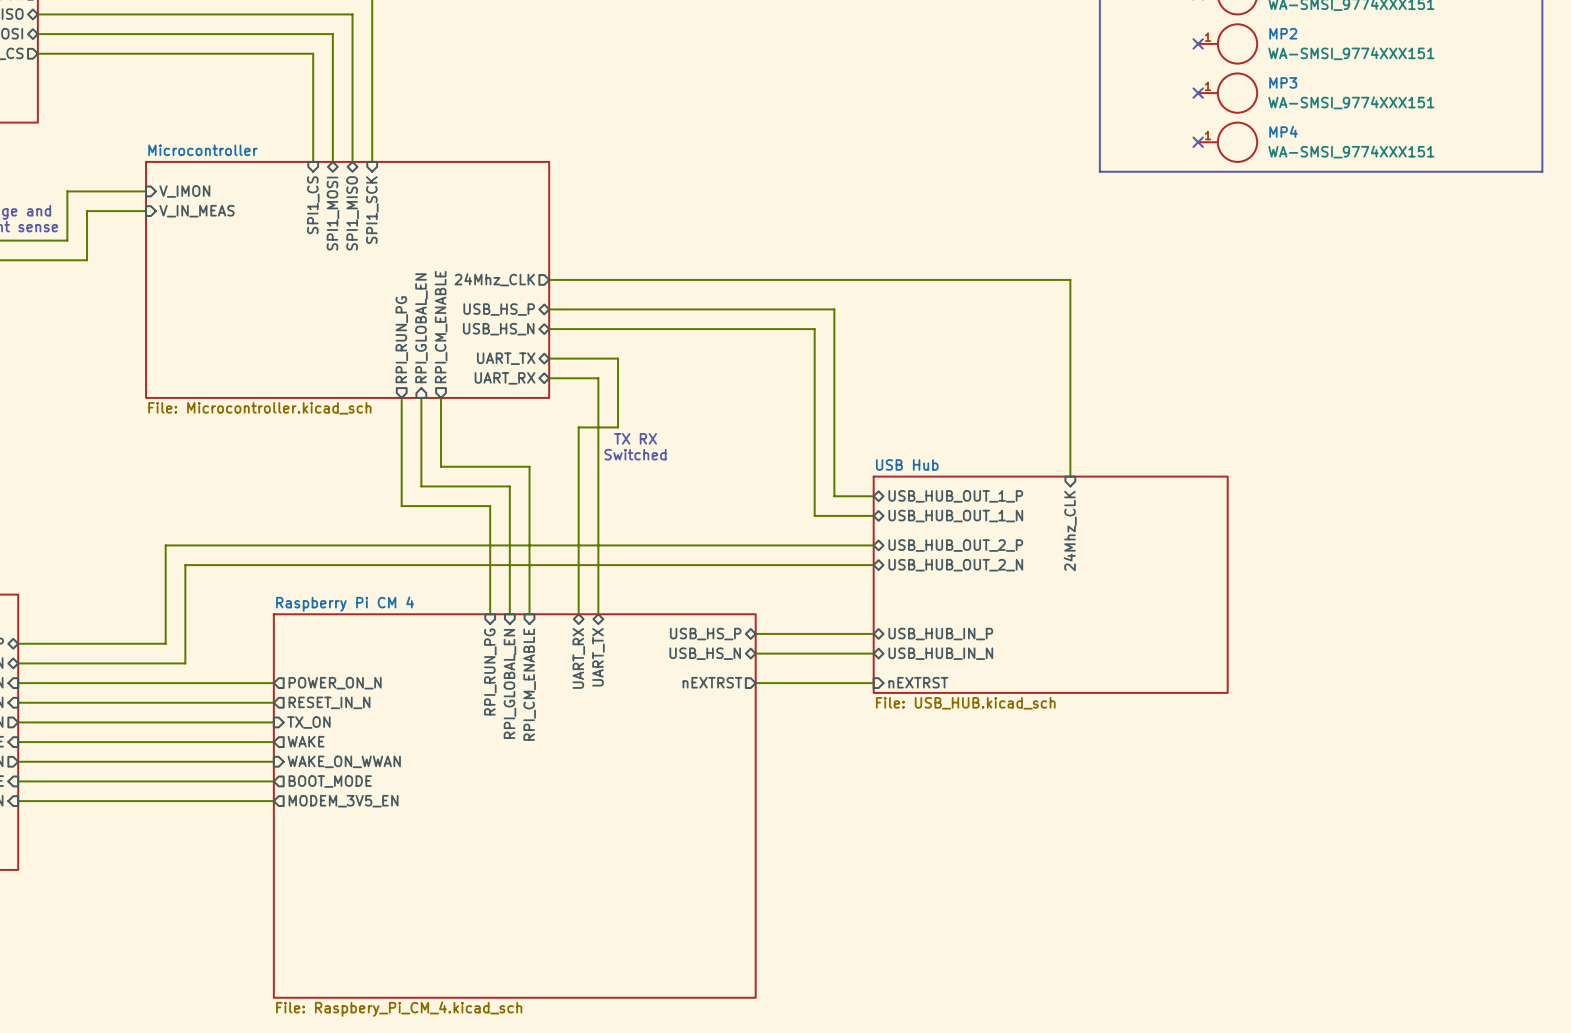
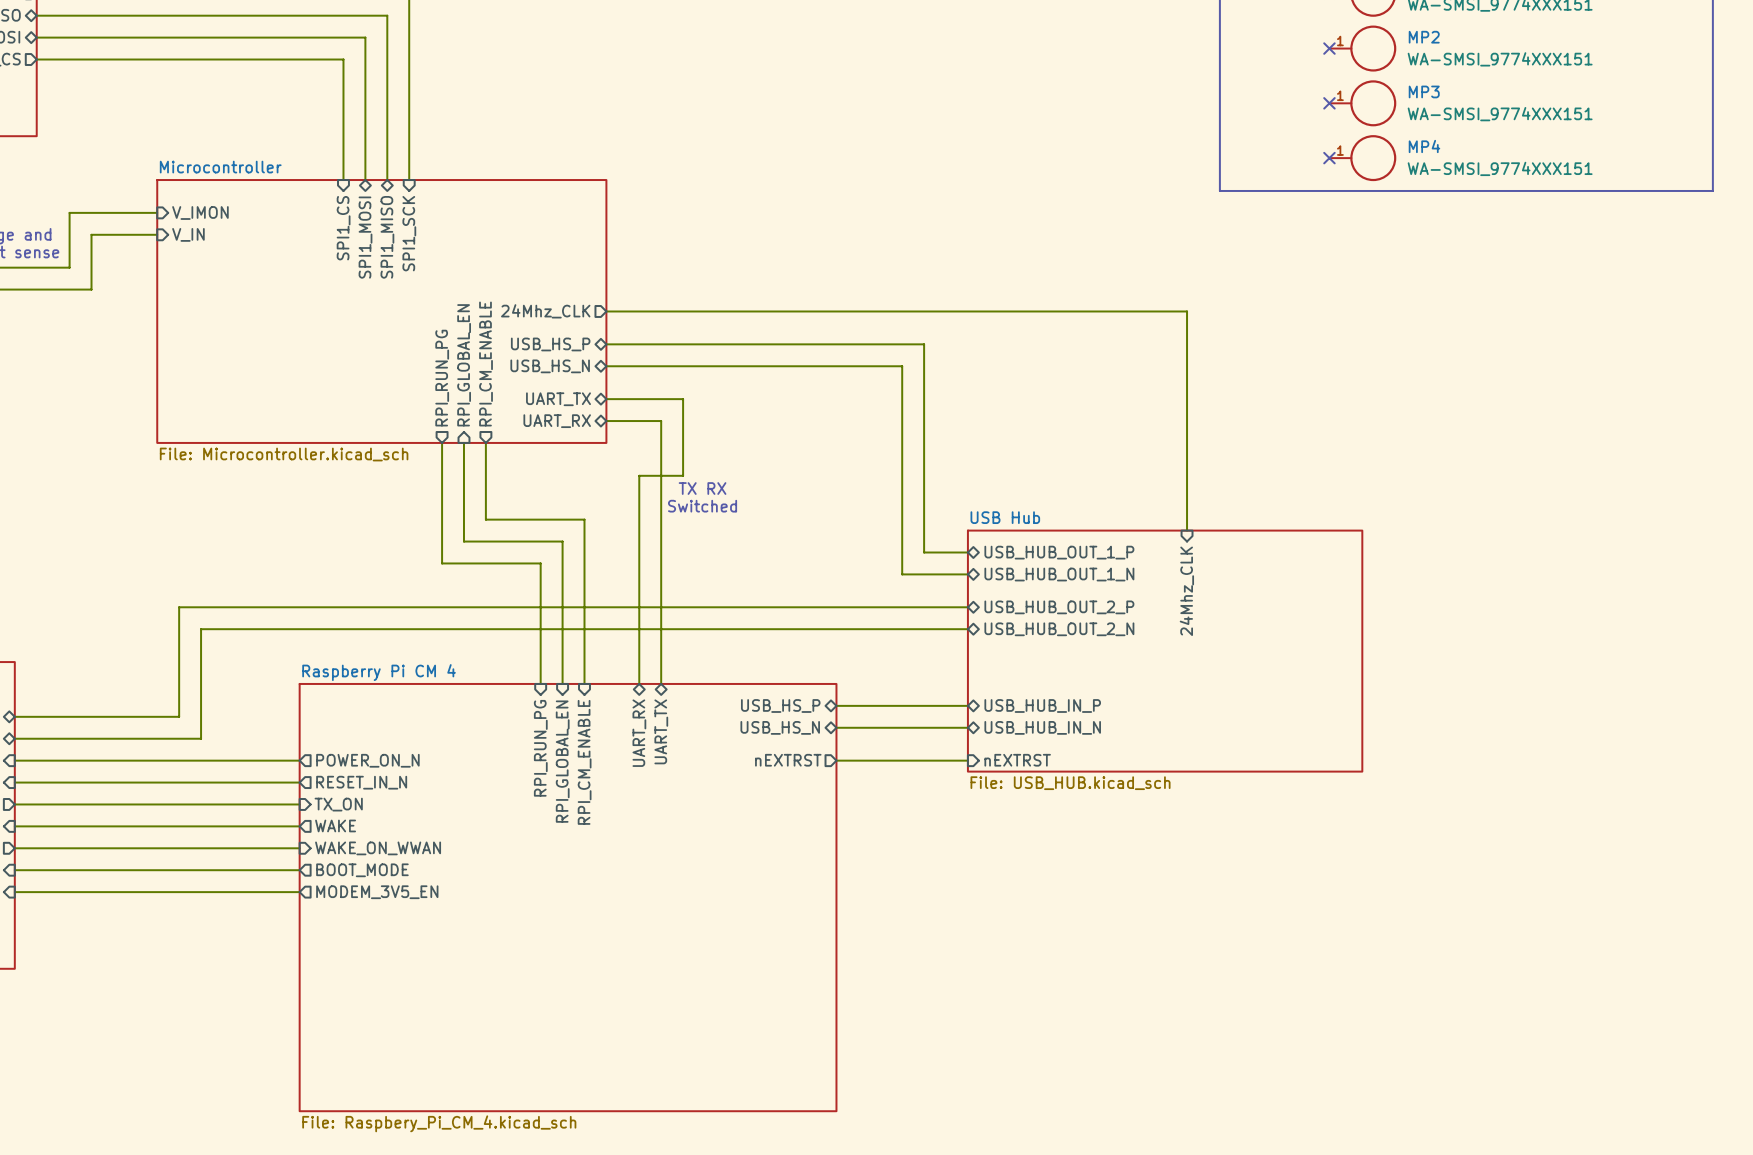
sheet pin: V_IN_MEAS (196, 211) -> V_IN (188, 234)

